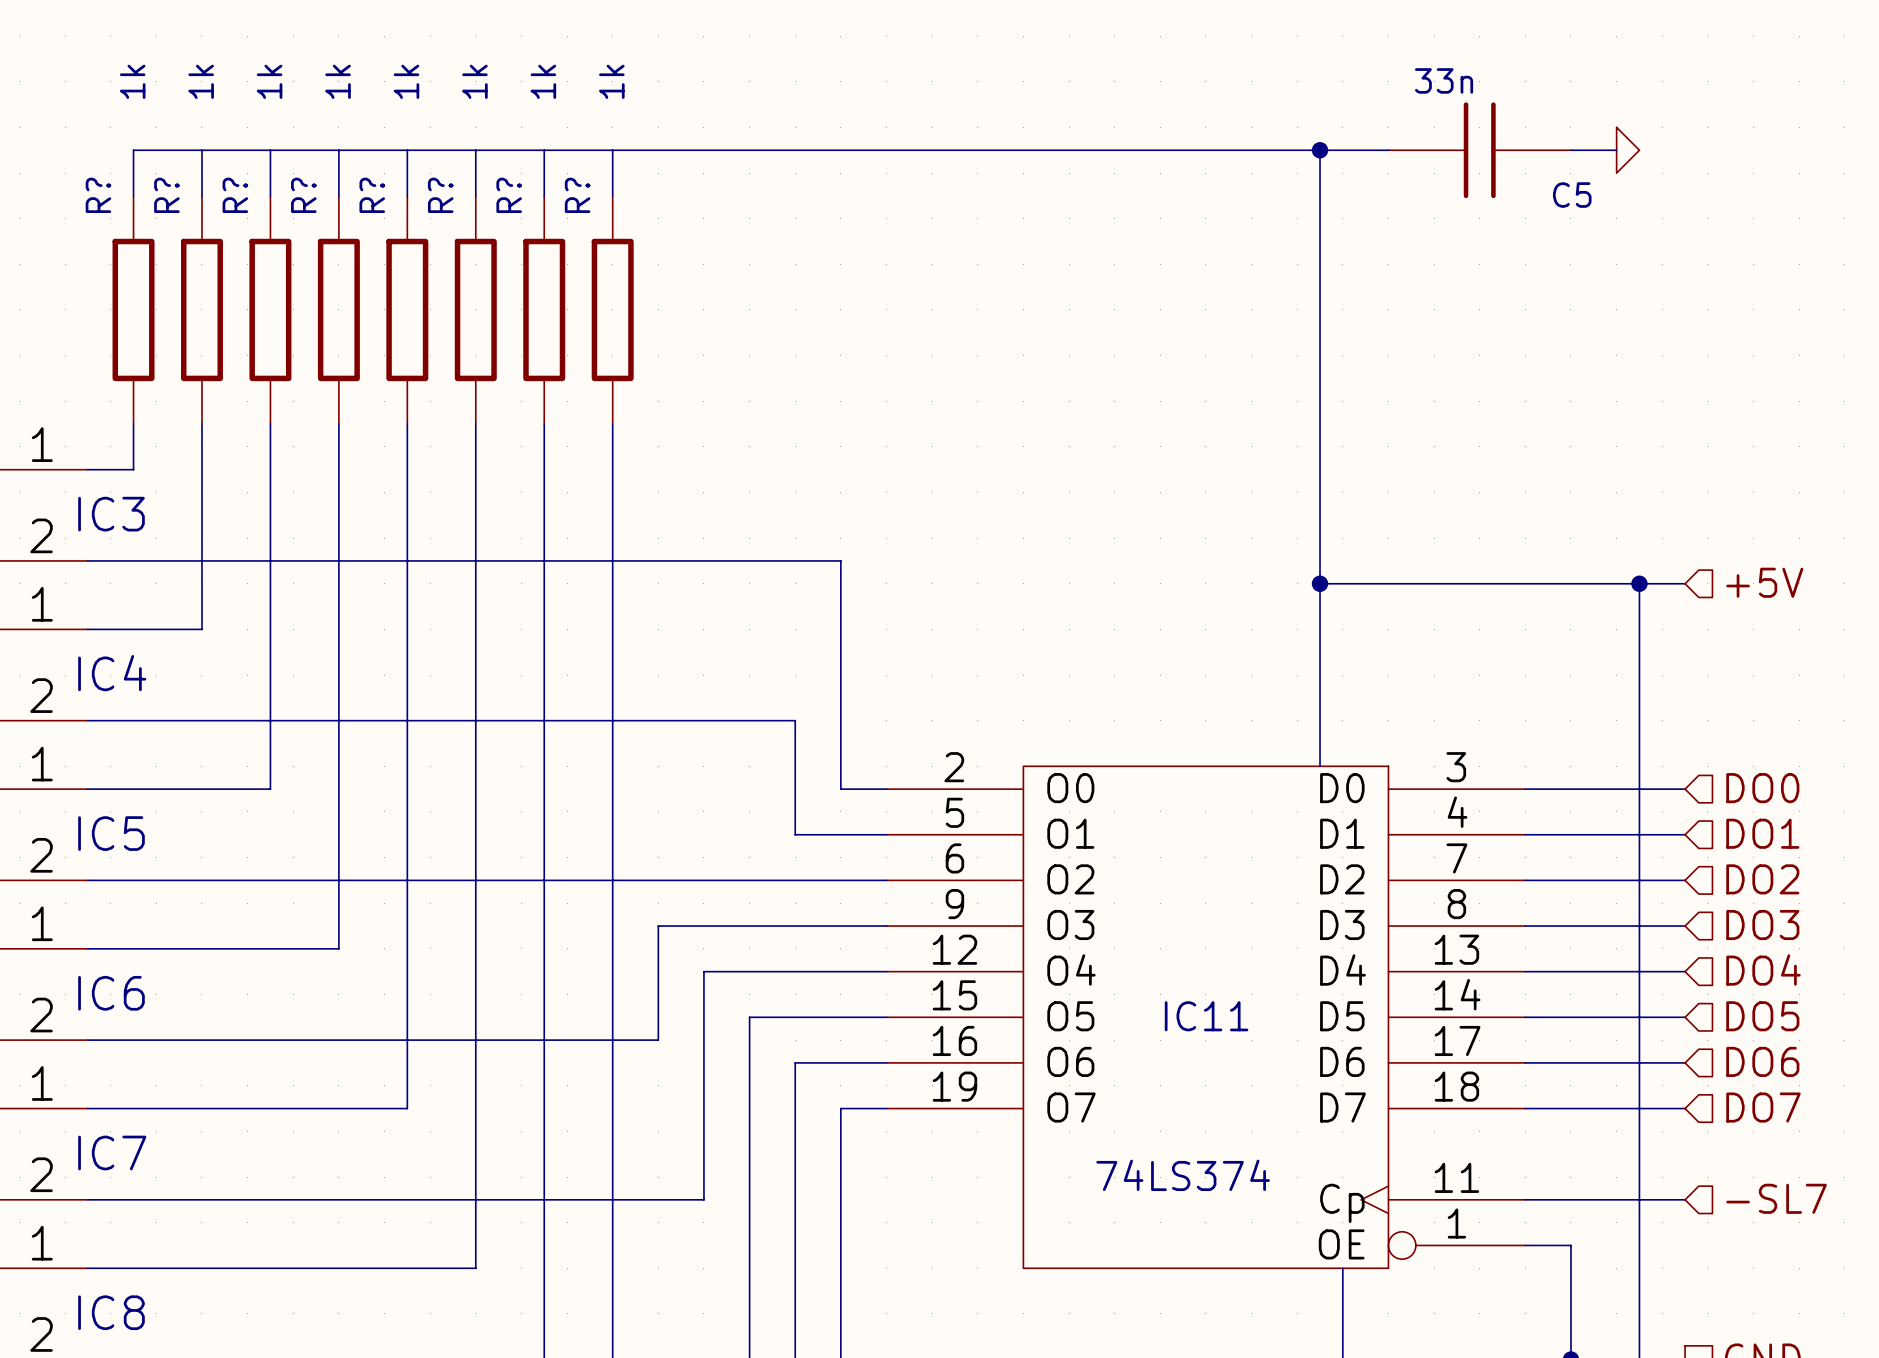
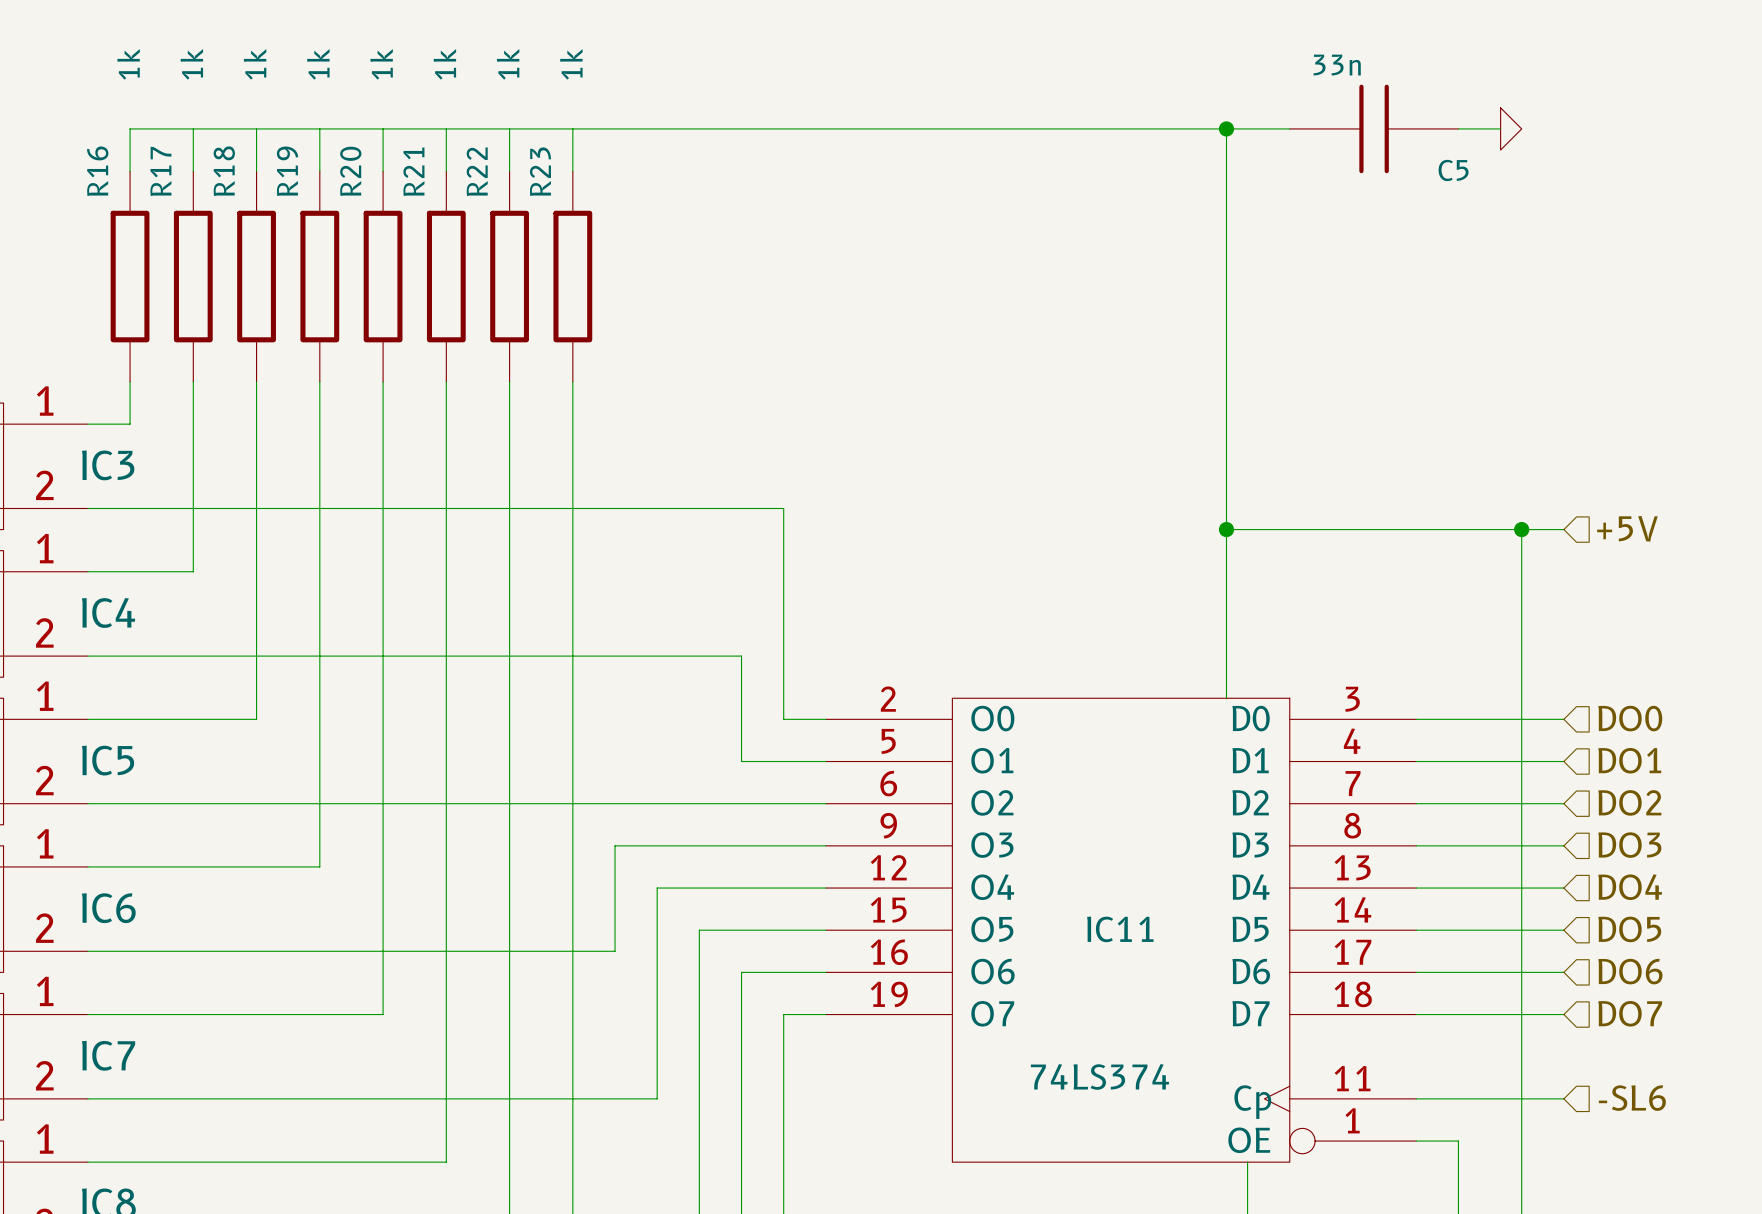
R? name: R? (98, 195) -> R16 (97, 171)
R? name: R? (166, 195) -> R17 (160, 171)
R? name: R? (235, 195) -> R18 (224, 171)
R? name: R? (303, 195) -> R19 (287, 171)
R? name: R? (372, 195) -> R20 (350, 171)
R? name: R? (440, 195) -> R21 (413, 171)
R? name: R? (509, 195) -> R22 (477, 171)
R? name: R? (577, 195) -> R23 (540, 171)
hierarchical label: -SL7 (1776, 1198) -> -SL6 (1632, 1098)

